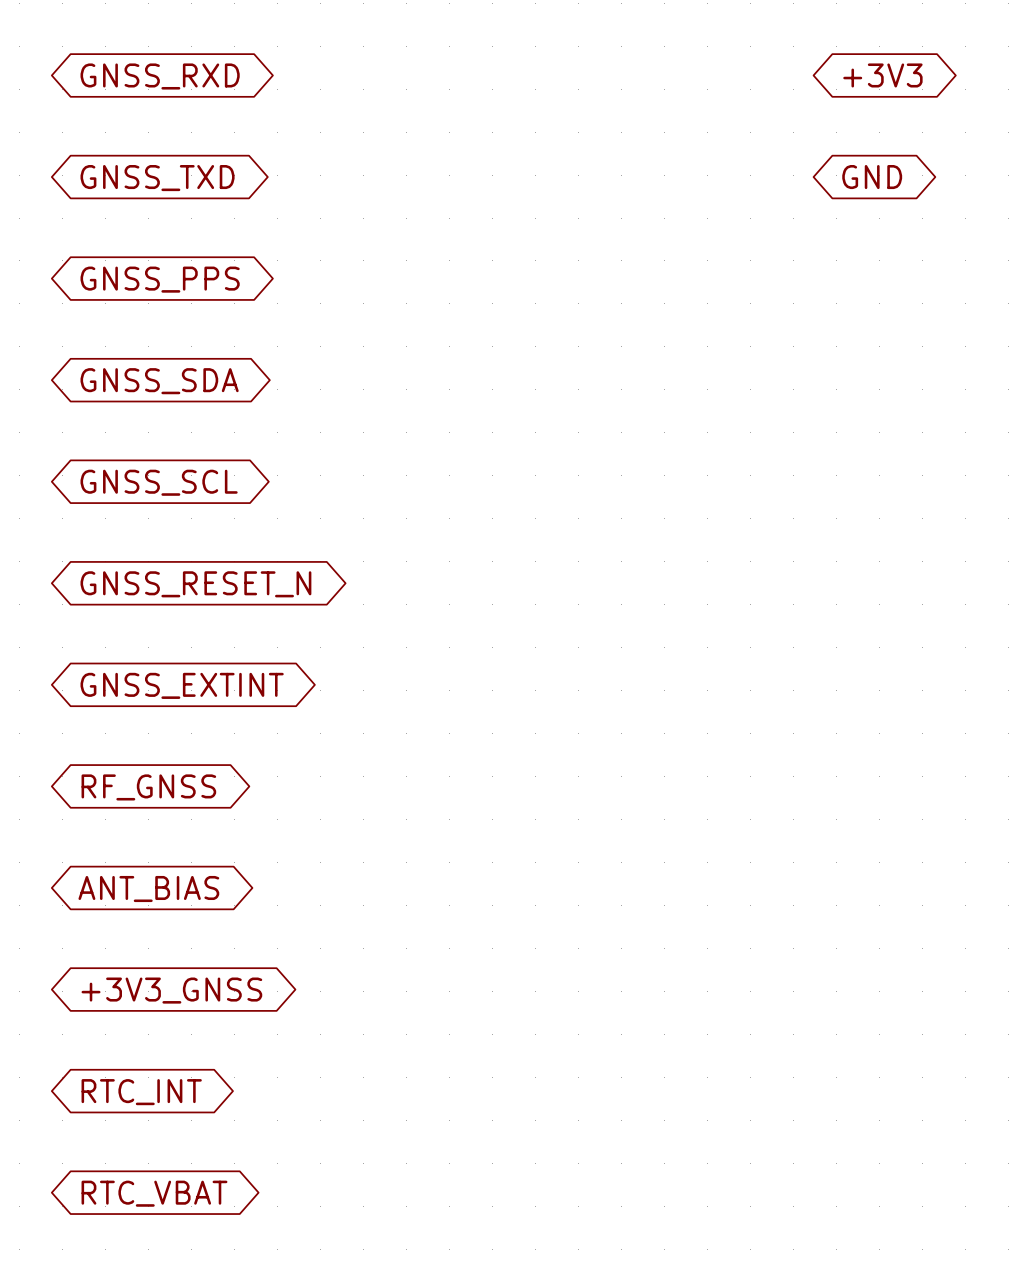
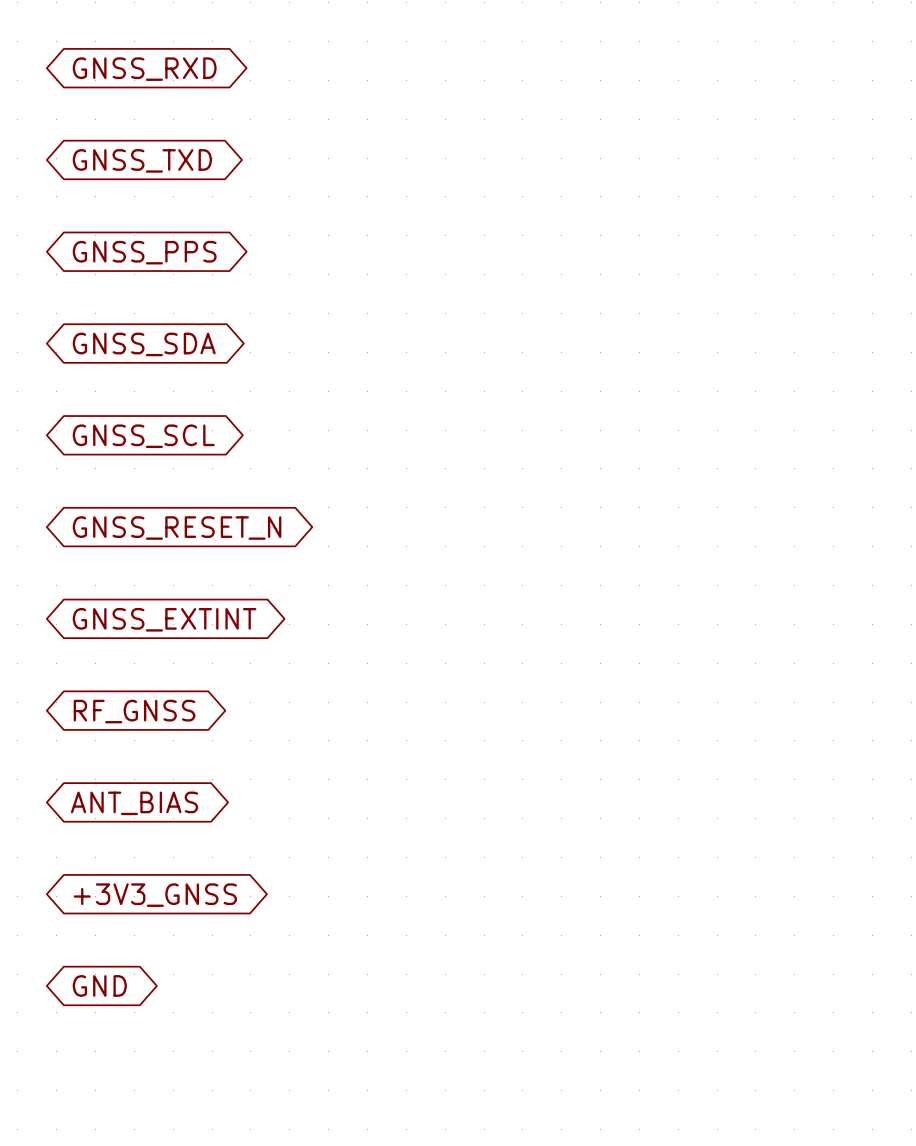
global label: +3V3 (882, 75) -> none
global label: GND (872, 177) -> none
global label: RTC_INT (141, 1092) -> GND (99, 985)
global label: RTC_VBAT (154, 1193) -> none

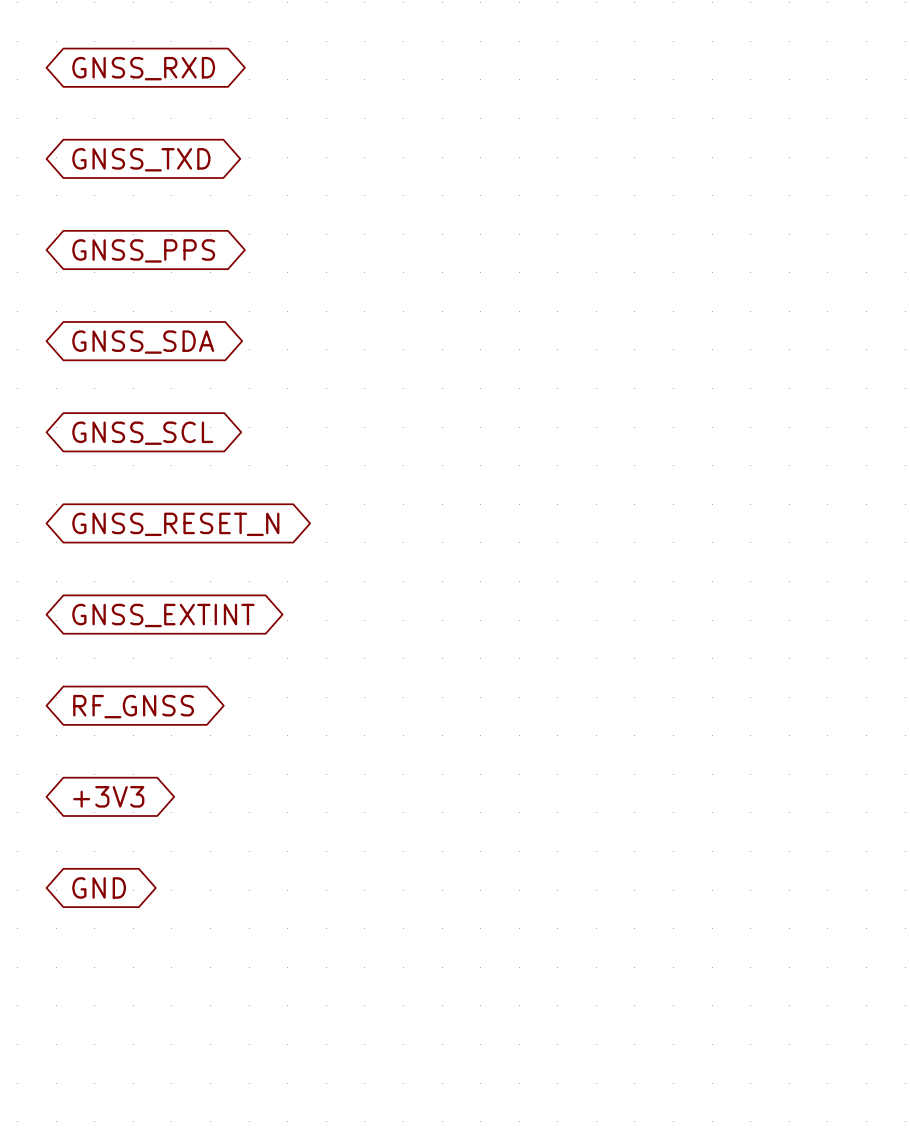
global label: ANT_BIAS (134, 803) -> +3V3 (108, 796)
global label: +3V3_GNSS (155, 895) -> GND (99, 887)
global label: GND (99, 985) -> none

